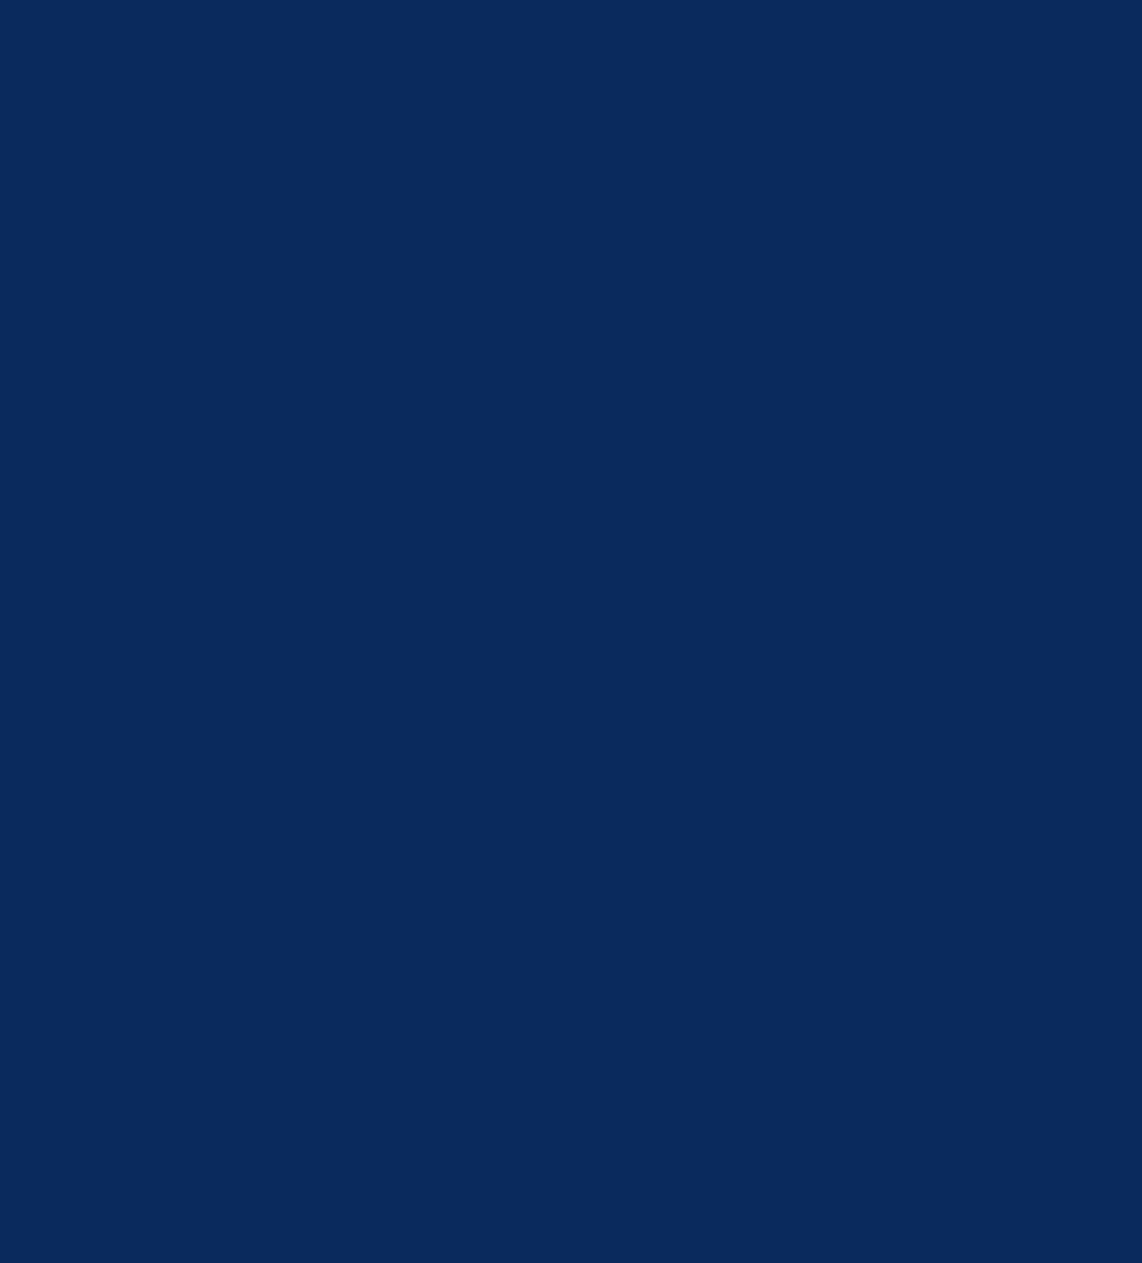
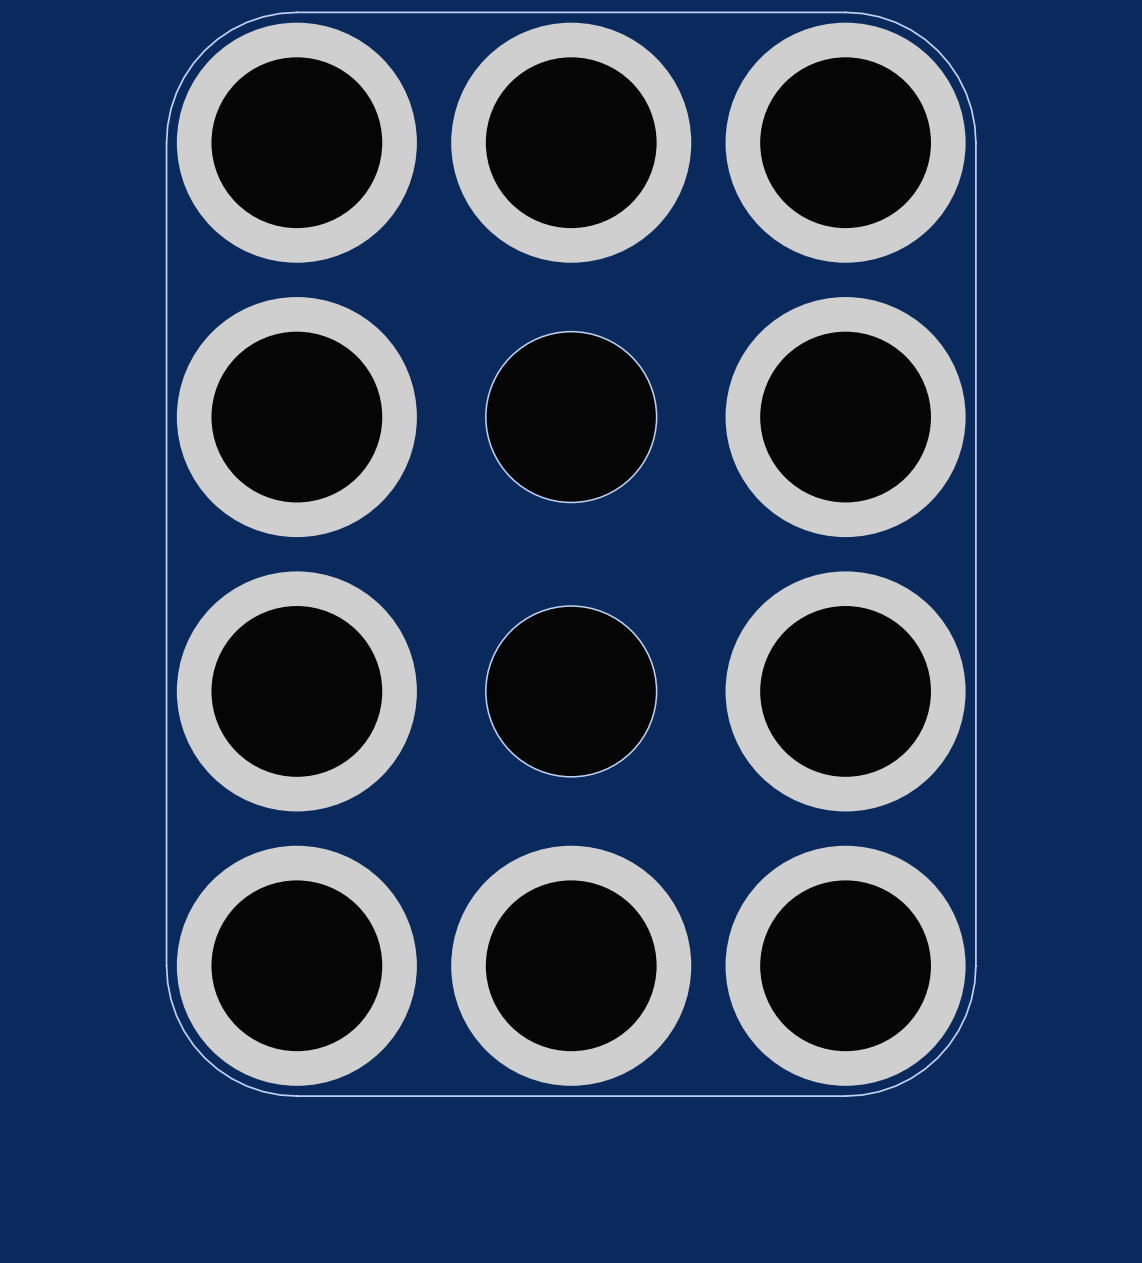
part: none -> (571, 554)

